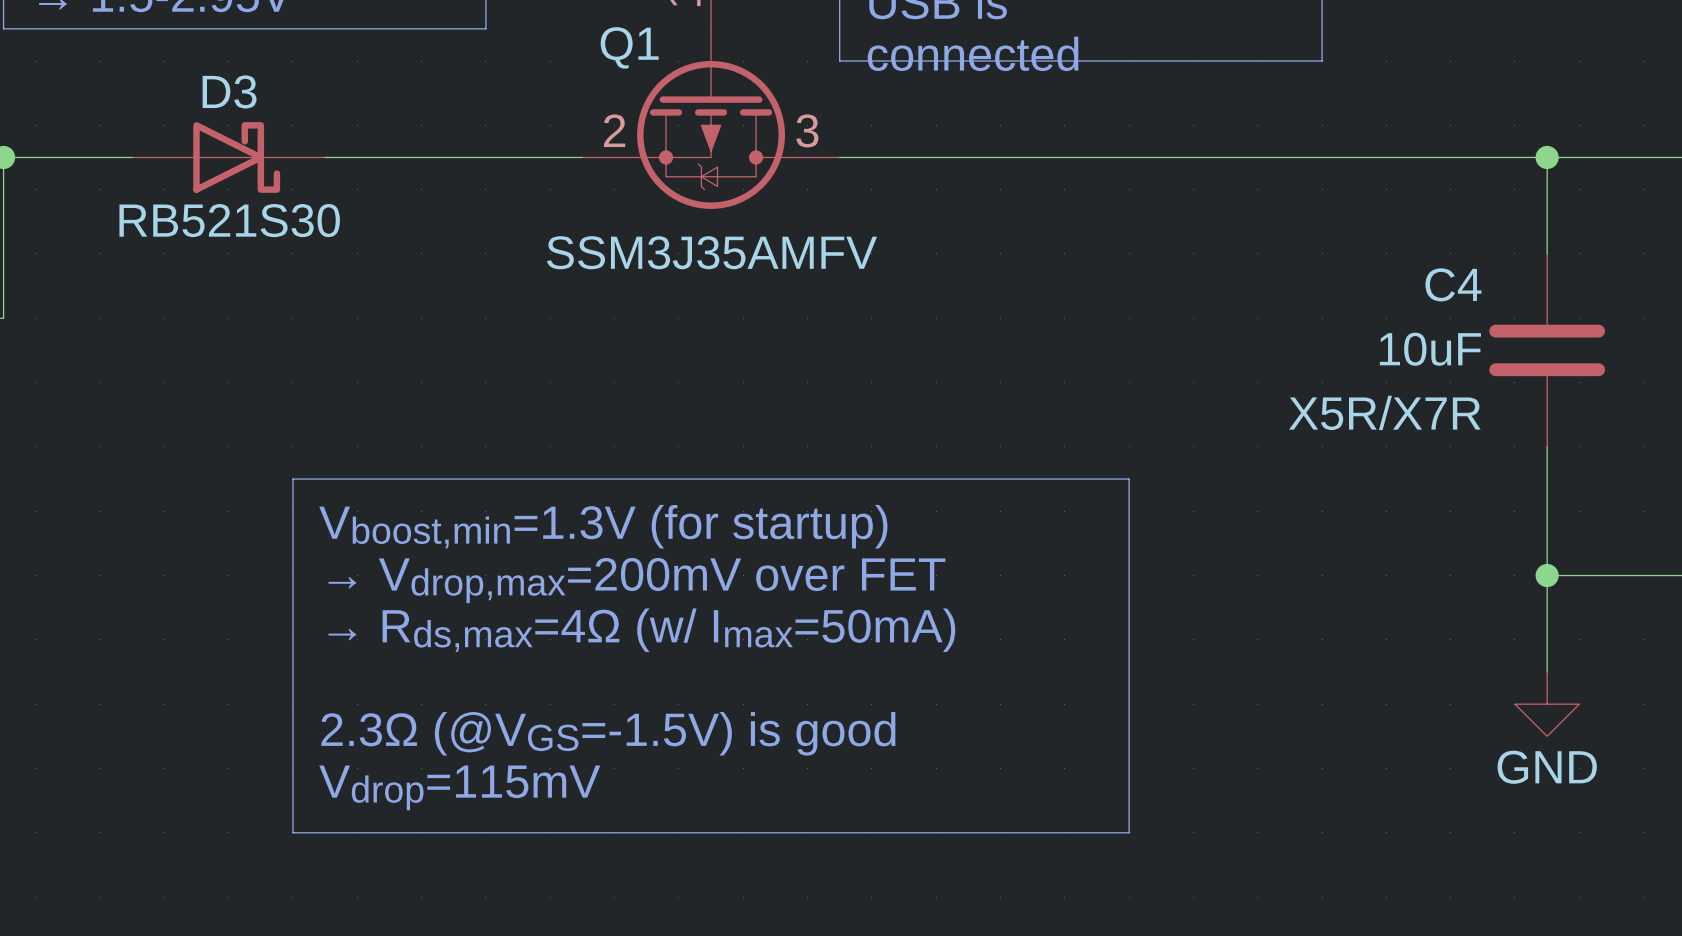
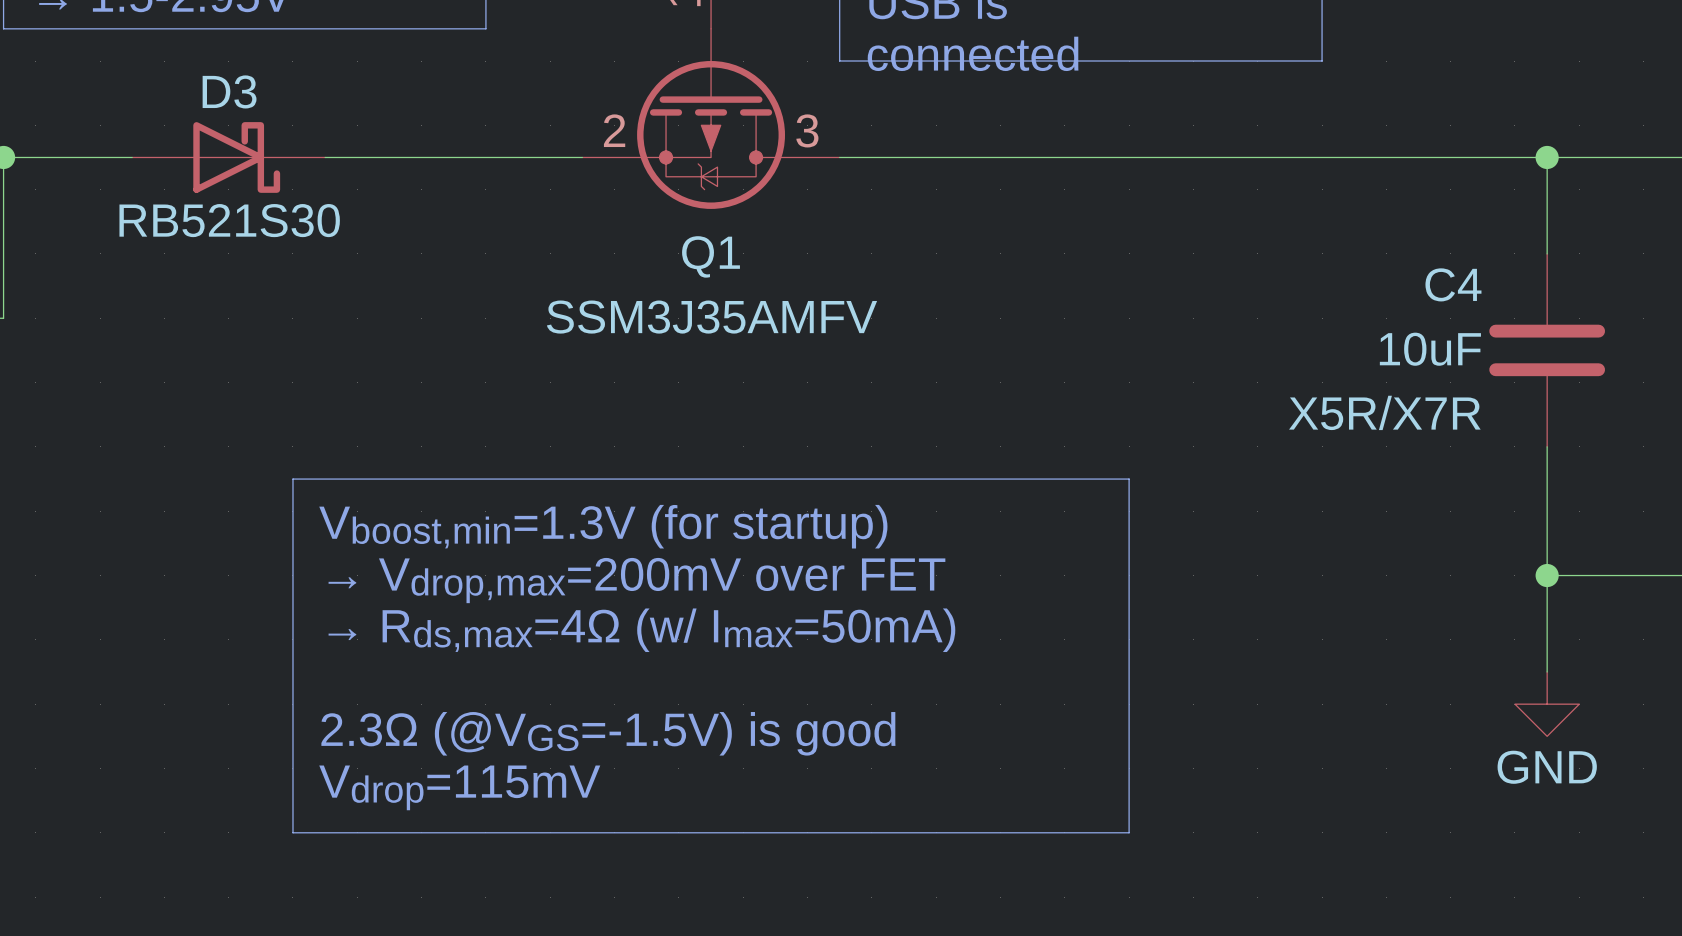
Q1 name position: Q1 (629, 47) -> Q1 (711, 256)
Q1 value position: SSM3J35AMFV (712, 252) -> SSM3J35AMFV (712, 317)

